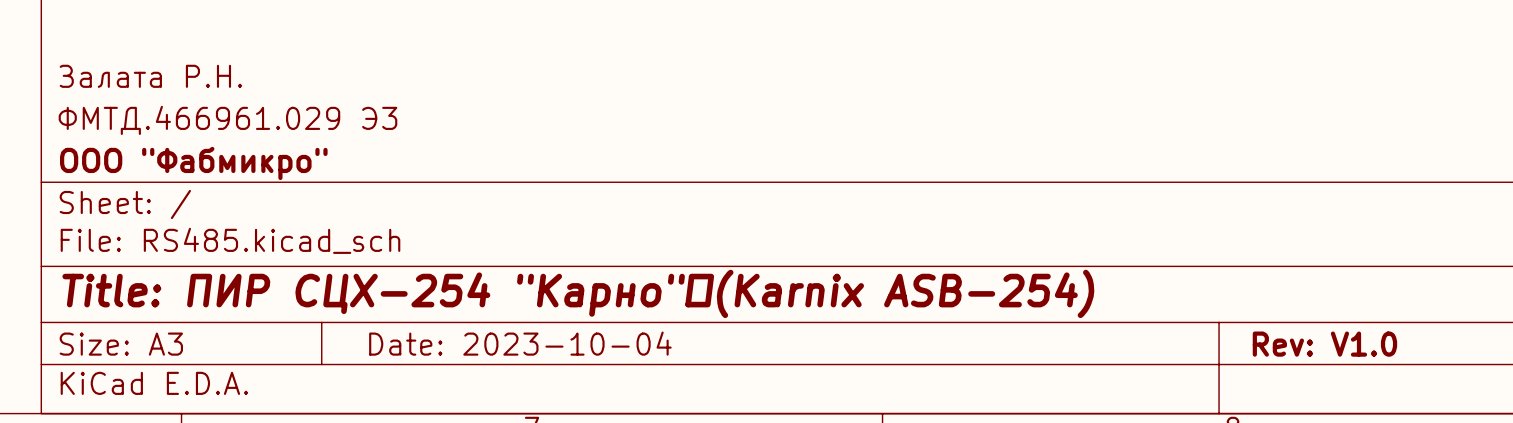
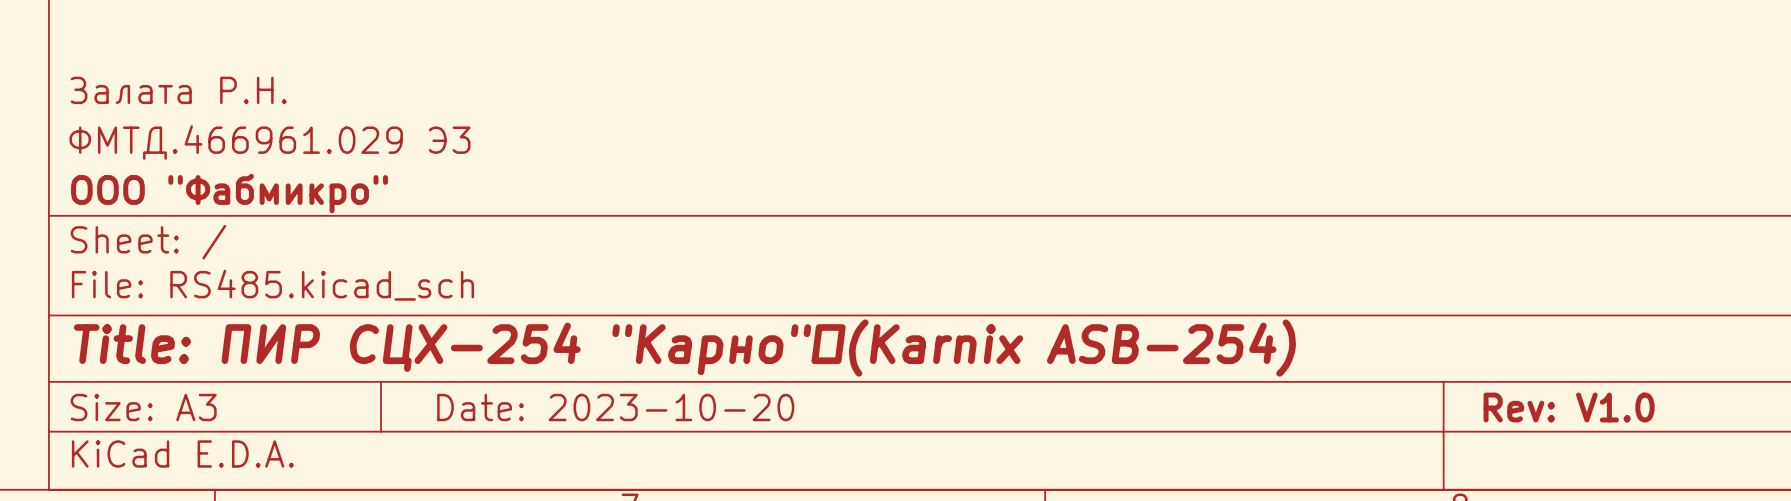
title block: Date: 2023-10-04 (520, 343) -> Date: 2023-10-20 (615, 407)

